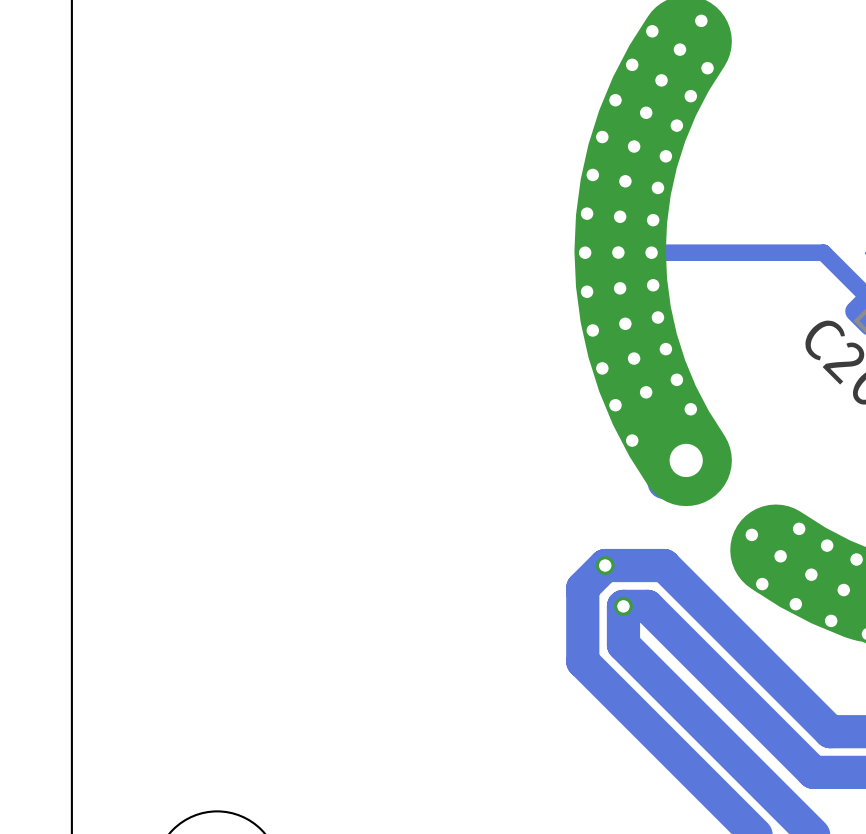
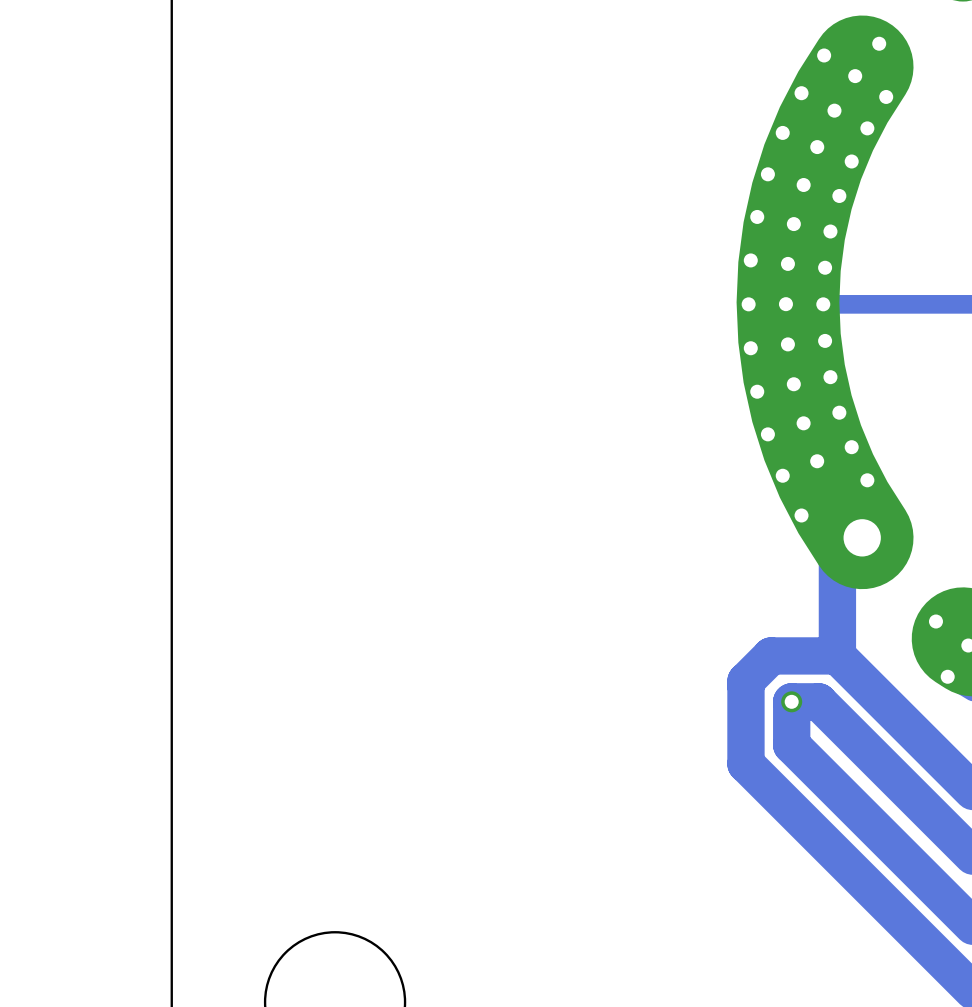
track: none -> (837, 562) (837, 655)
via: (605, 565) -> none

